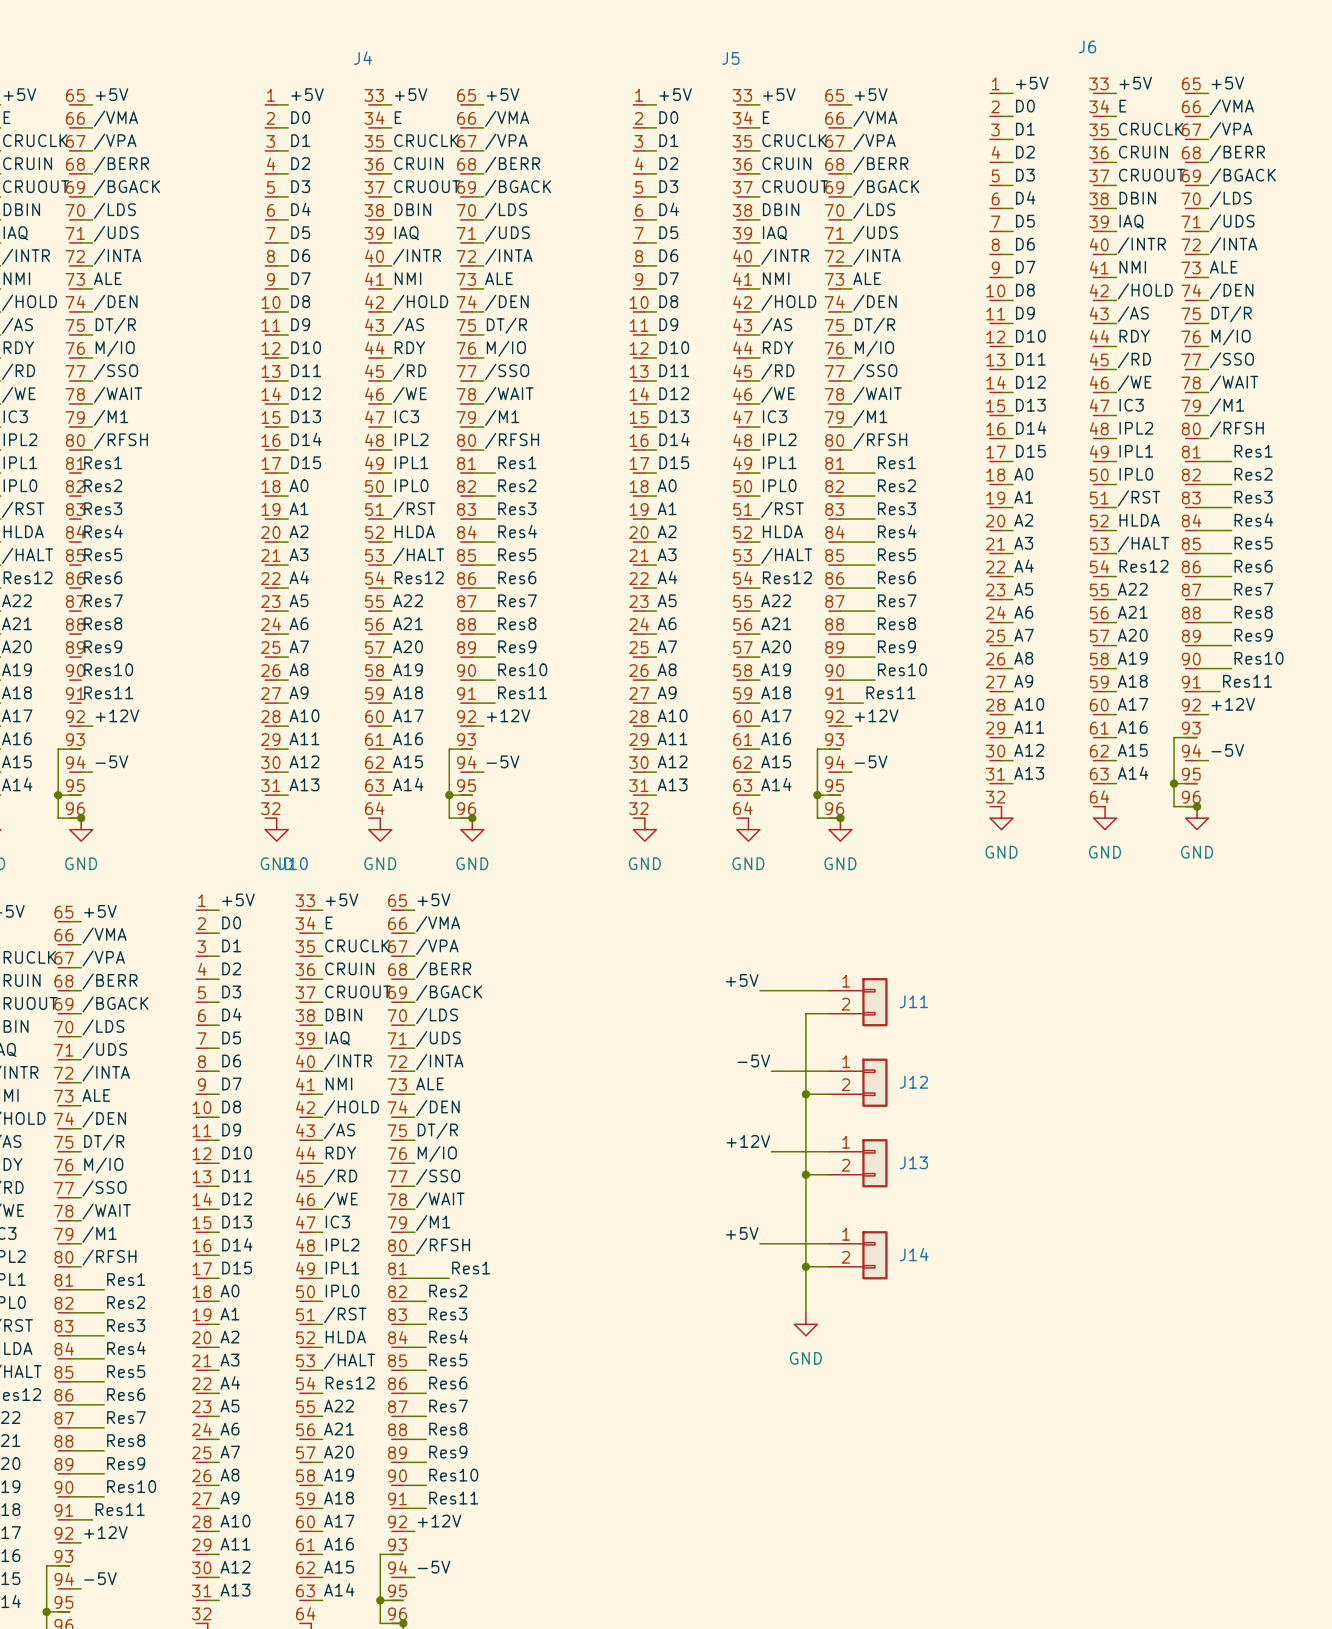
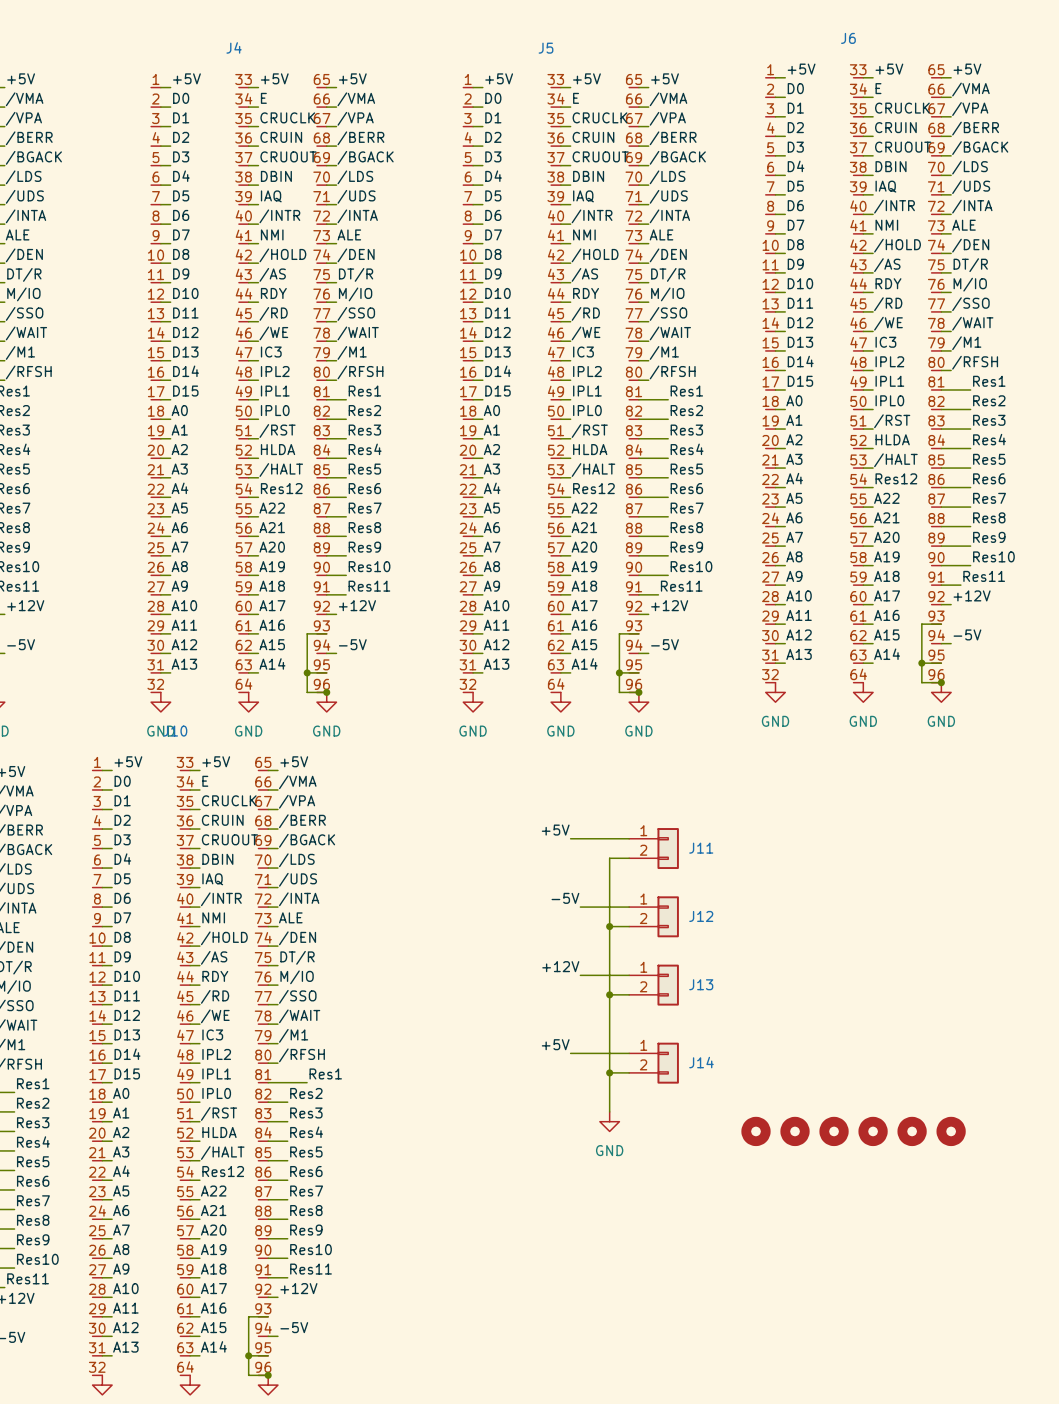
part: none -> (755, 1131)
part: none -> (795, 1131)
part: none -> (834, 1131)
part: none -> (873, 1131)
part: none -> (912, 1131)
part: none -> (951, 1131)

